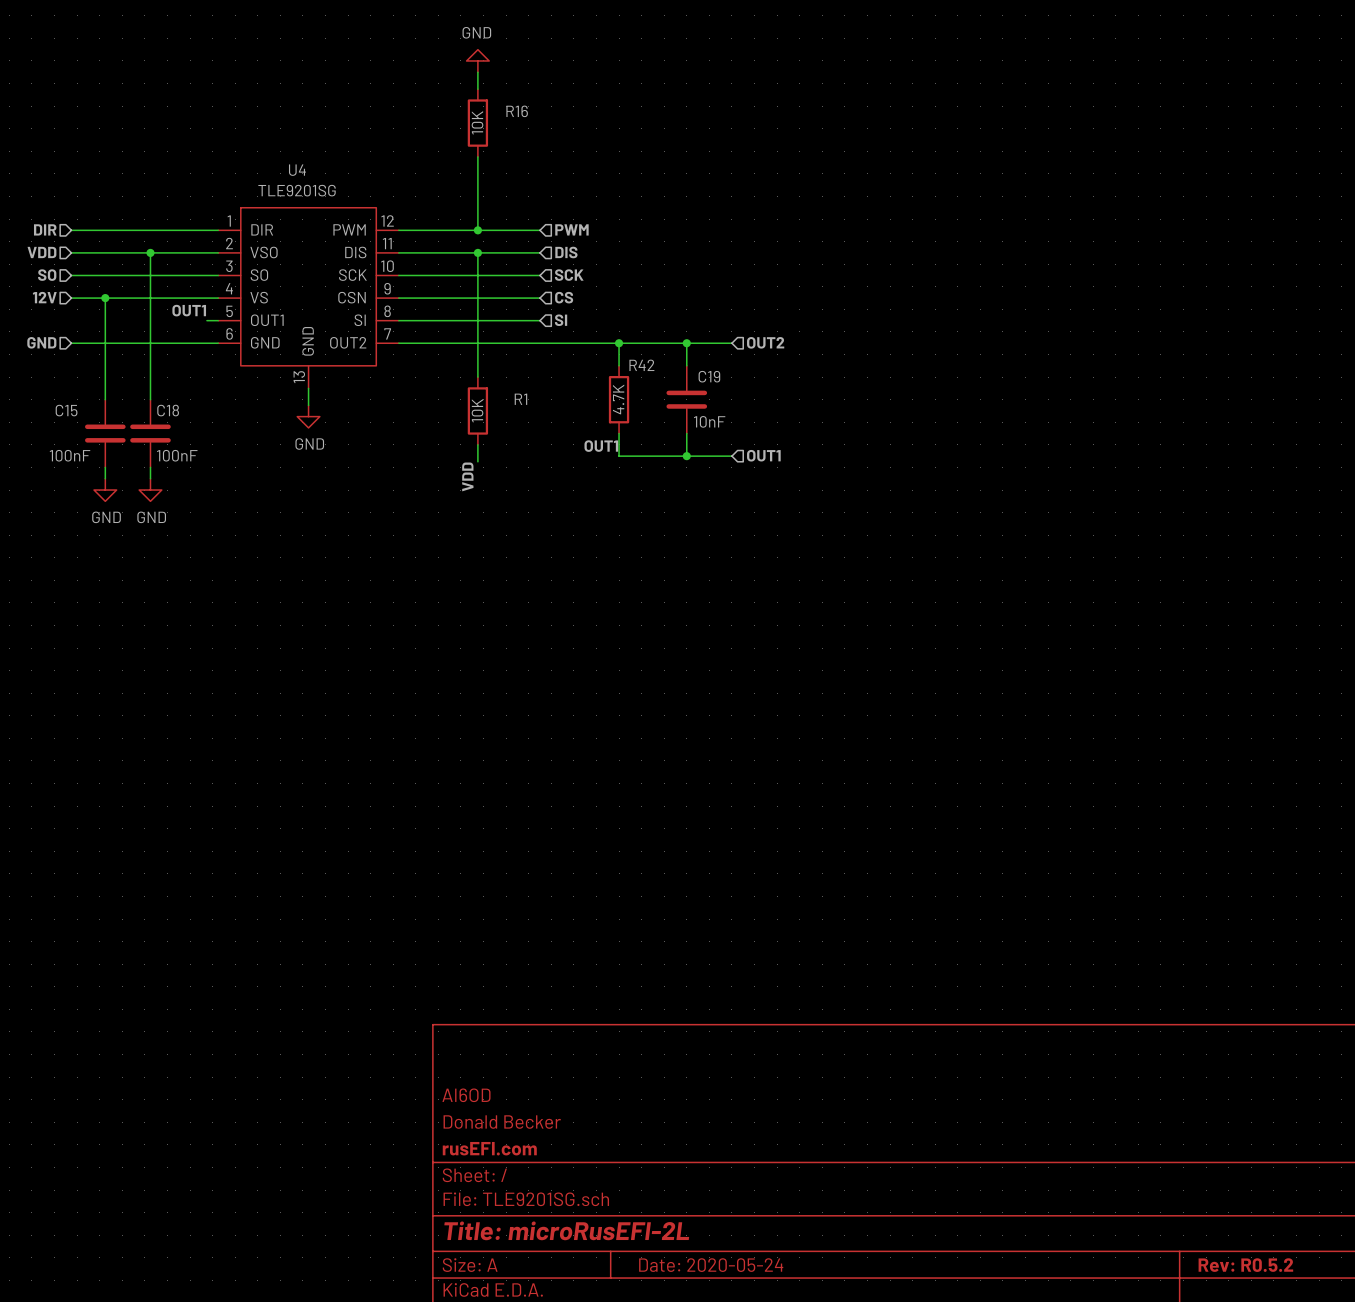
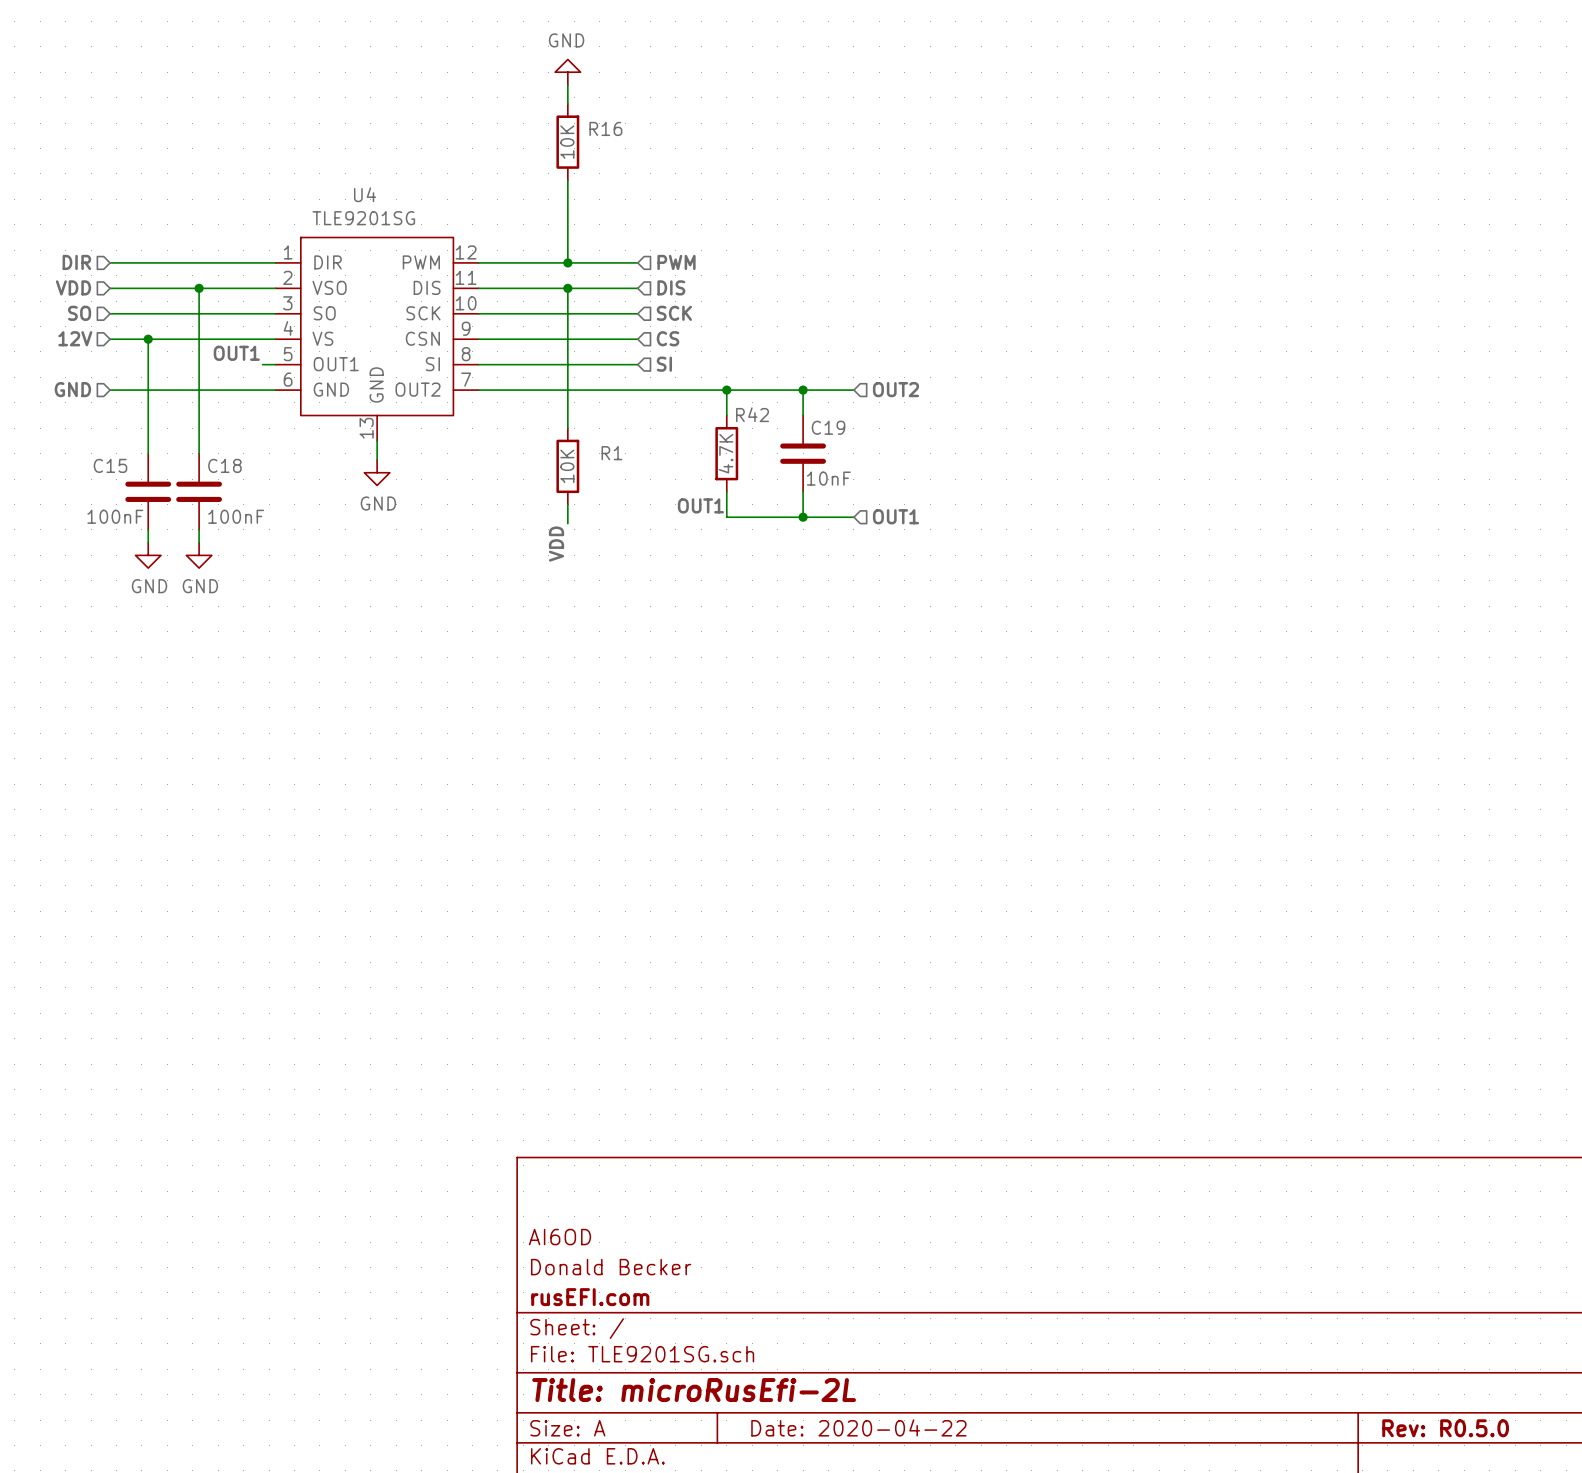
title block: Title: microRusEFI-2L (566, 1230) -> Title: microRusEfi-2L (694, 1390)
title block: Date: 2020-05-24 (711, 1265) -> Date: 2020-04-22 (858, 1427)
title block: Rev: R0.5.2 (1245, 1265) -> Rev: R0.5.0 (1445, 1428)

